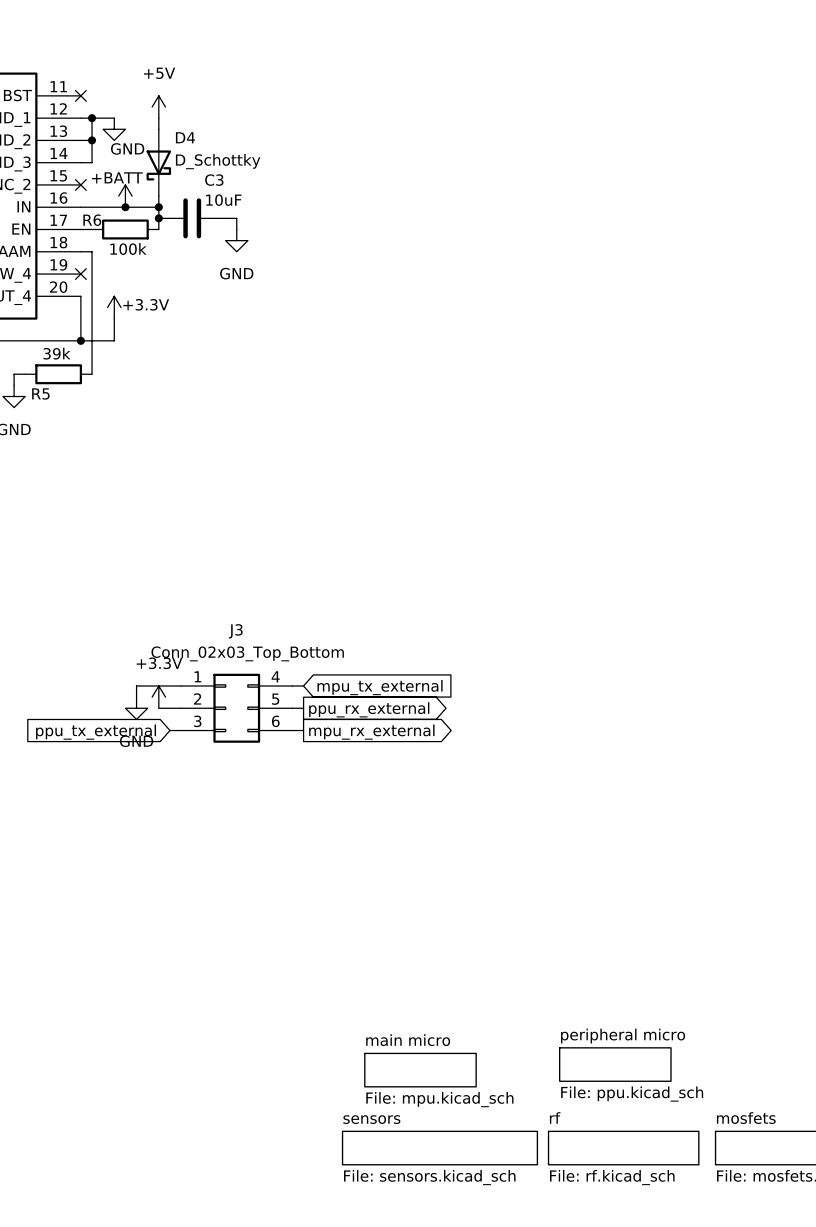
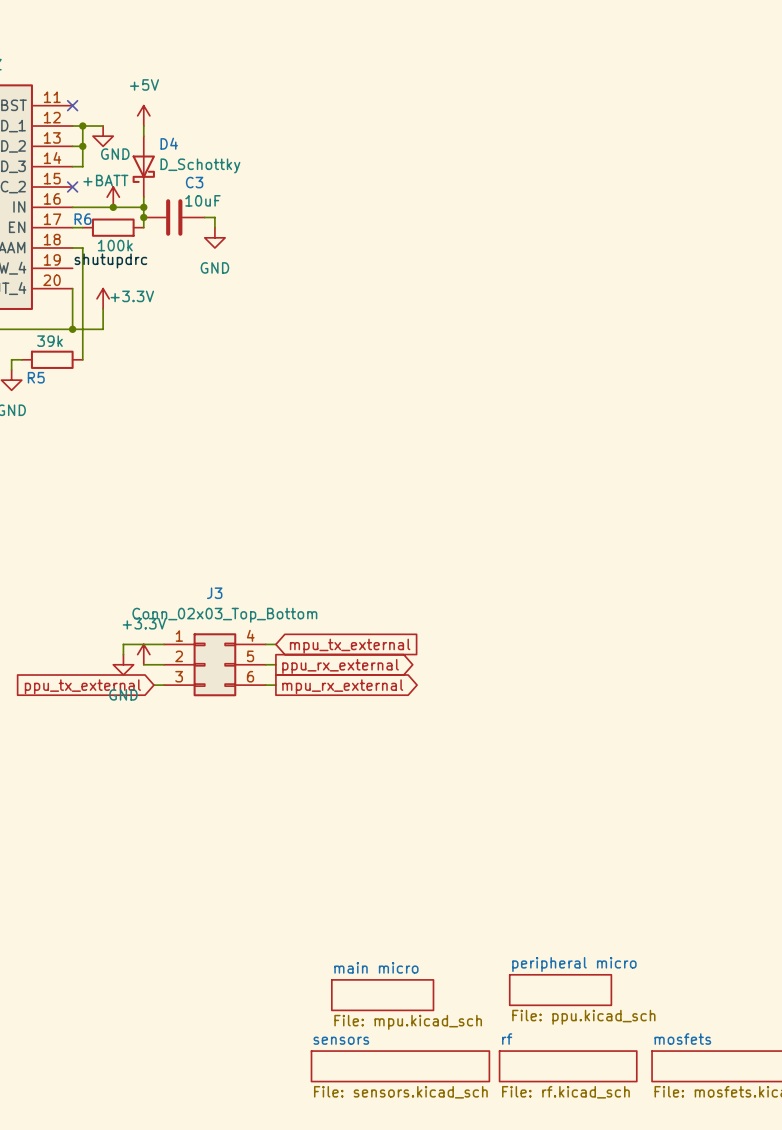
label: none -> shutupdrc (110, 260)
no-connect mark: (80, 274) -> none

